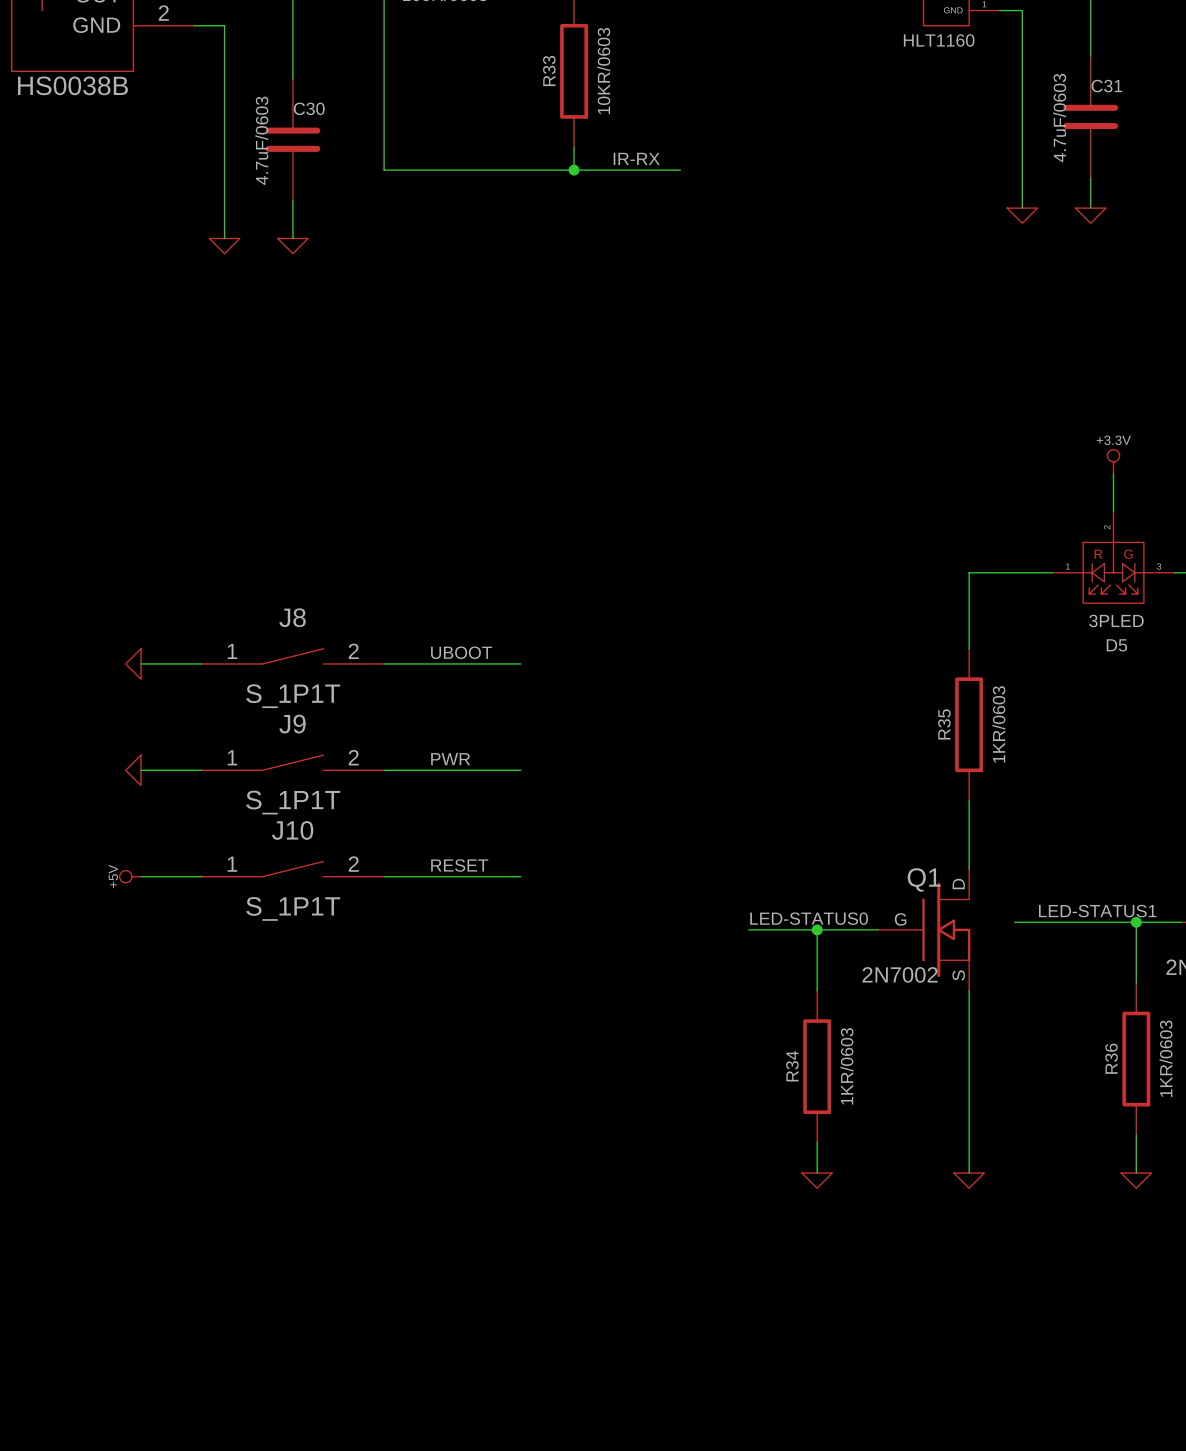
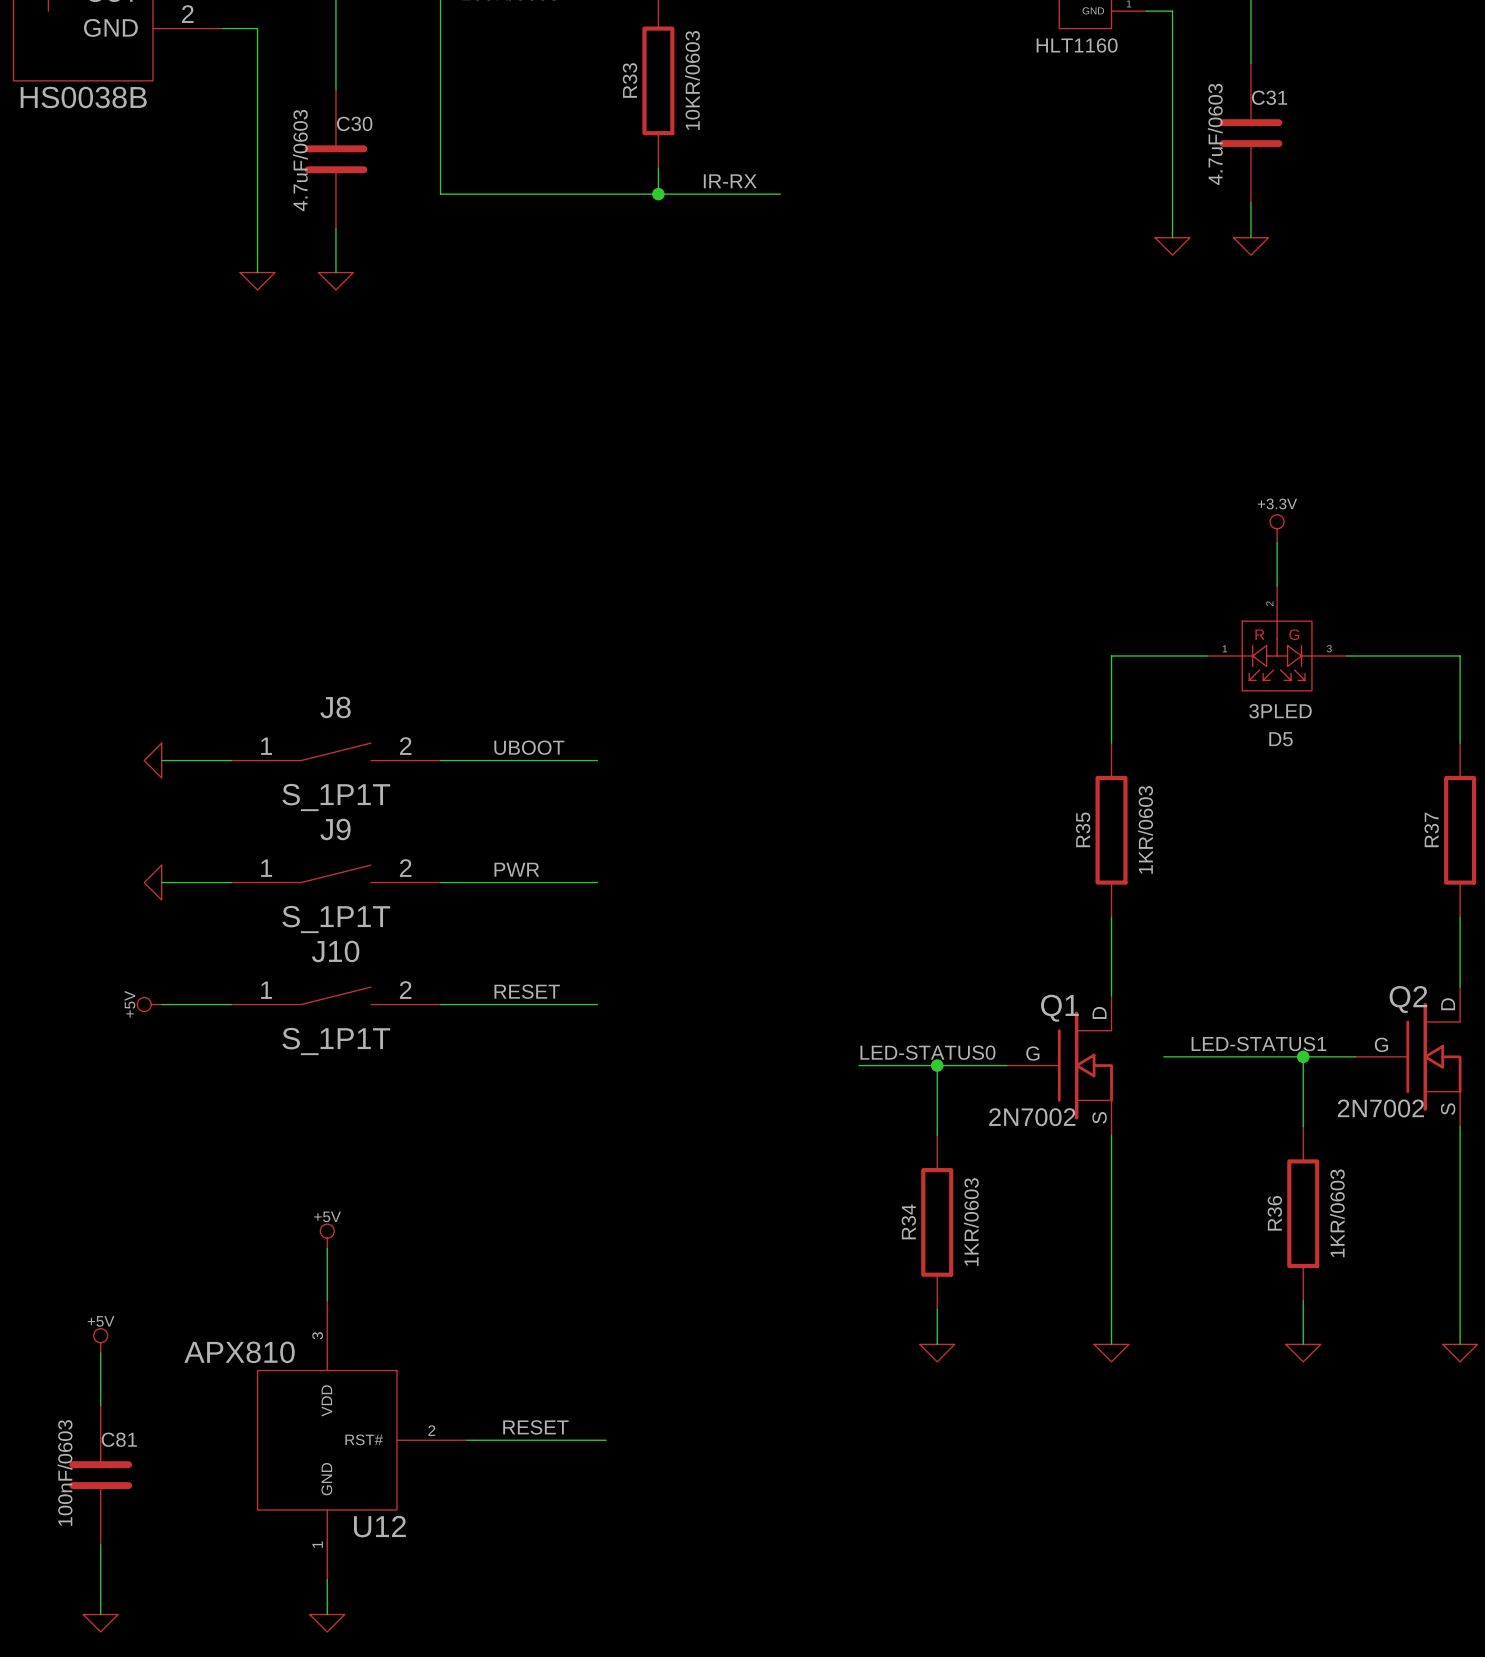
power symbol: none -> +5V (327, 1236)
wire: none -> (327, 1248) (327, 1300)
power symbol: none -> +5V (100, 1340)
wire: none -> (100, 1353) (100, 1405)
label: none -> RESET (535, 1427)
U12: none -> APX810 (362, 1440)
wire: none -> (466, 1440) (606, 1440)
C81: none -> 100nF/0603 (100, 1475)
wire: none -> (100, 1544) (100, 1614)
wire: none -> (327, 1579) (327, 1614)
power symbol: none -> (100, 1623)
power symbol: none -> (327, 1623)

